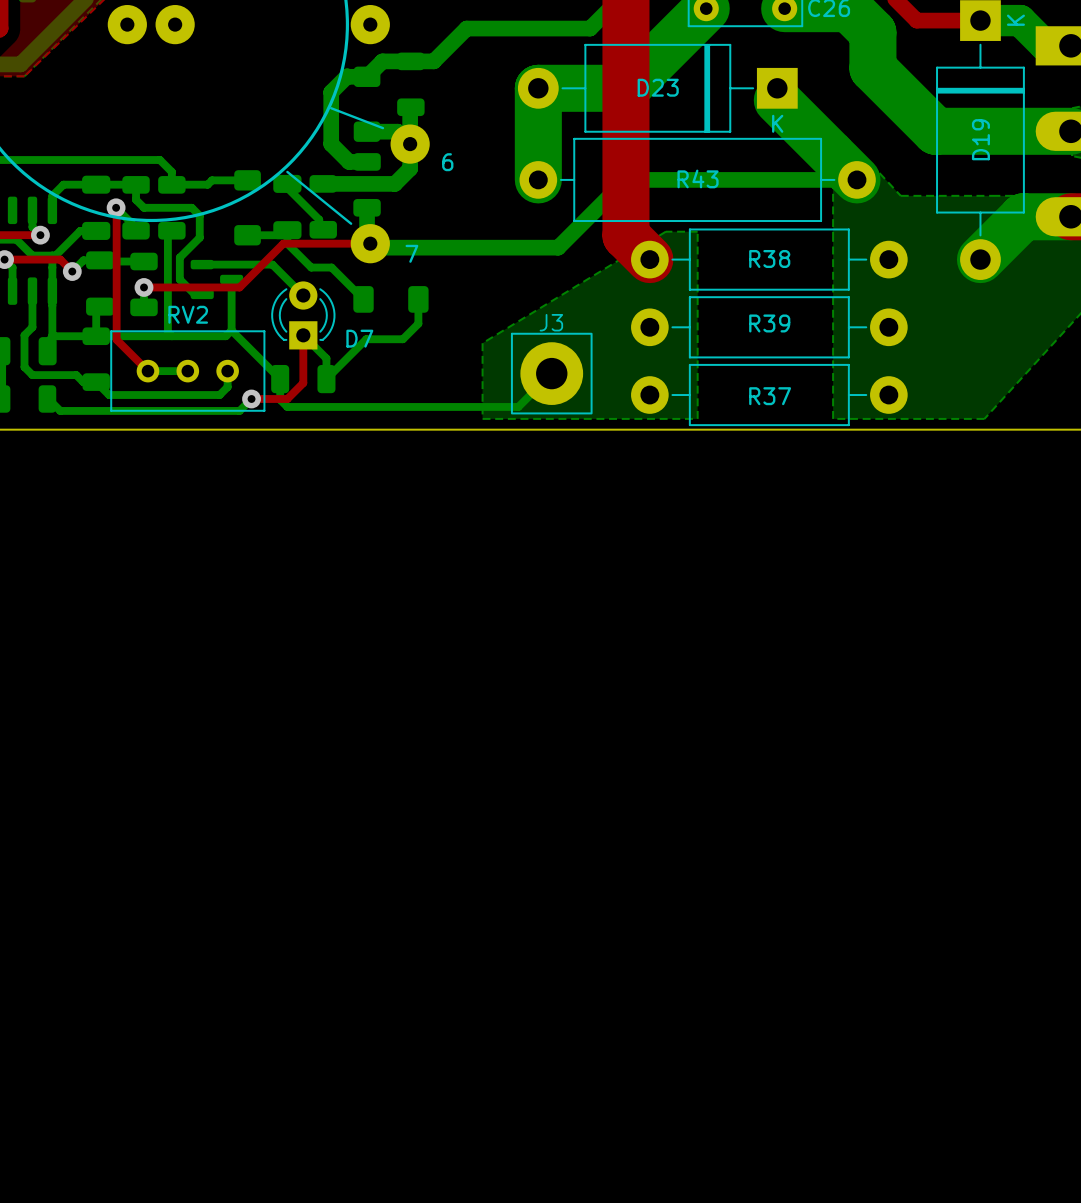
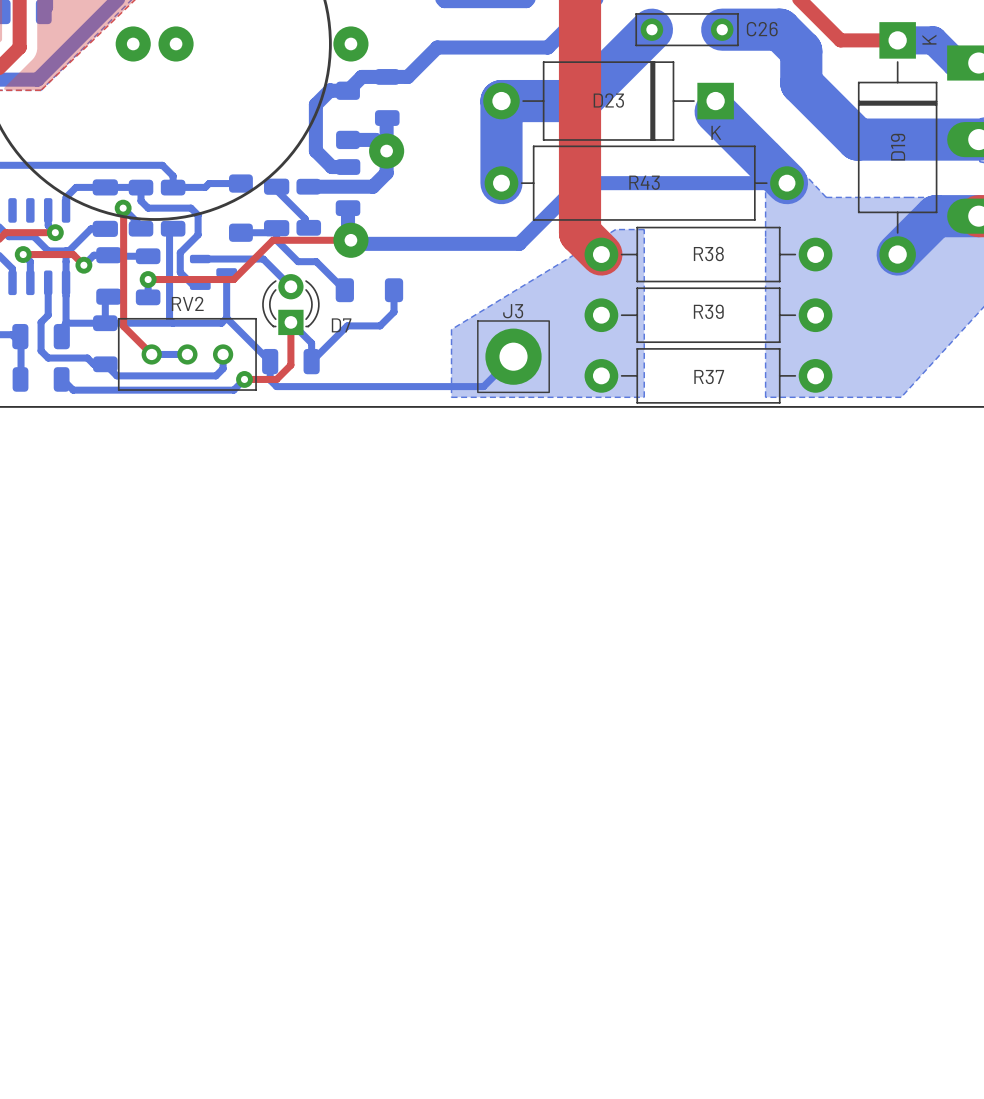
line: (331, 108) (382, 128) -> none
text: 6 (447, 162) -> none
line: (287, 171) (351, 223) -> none
text: 7 (411, 253) -> none

